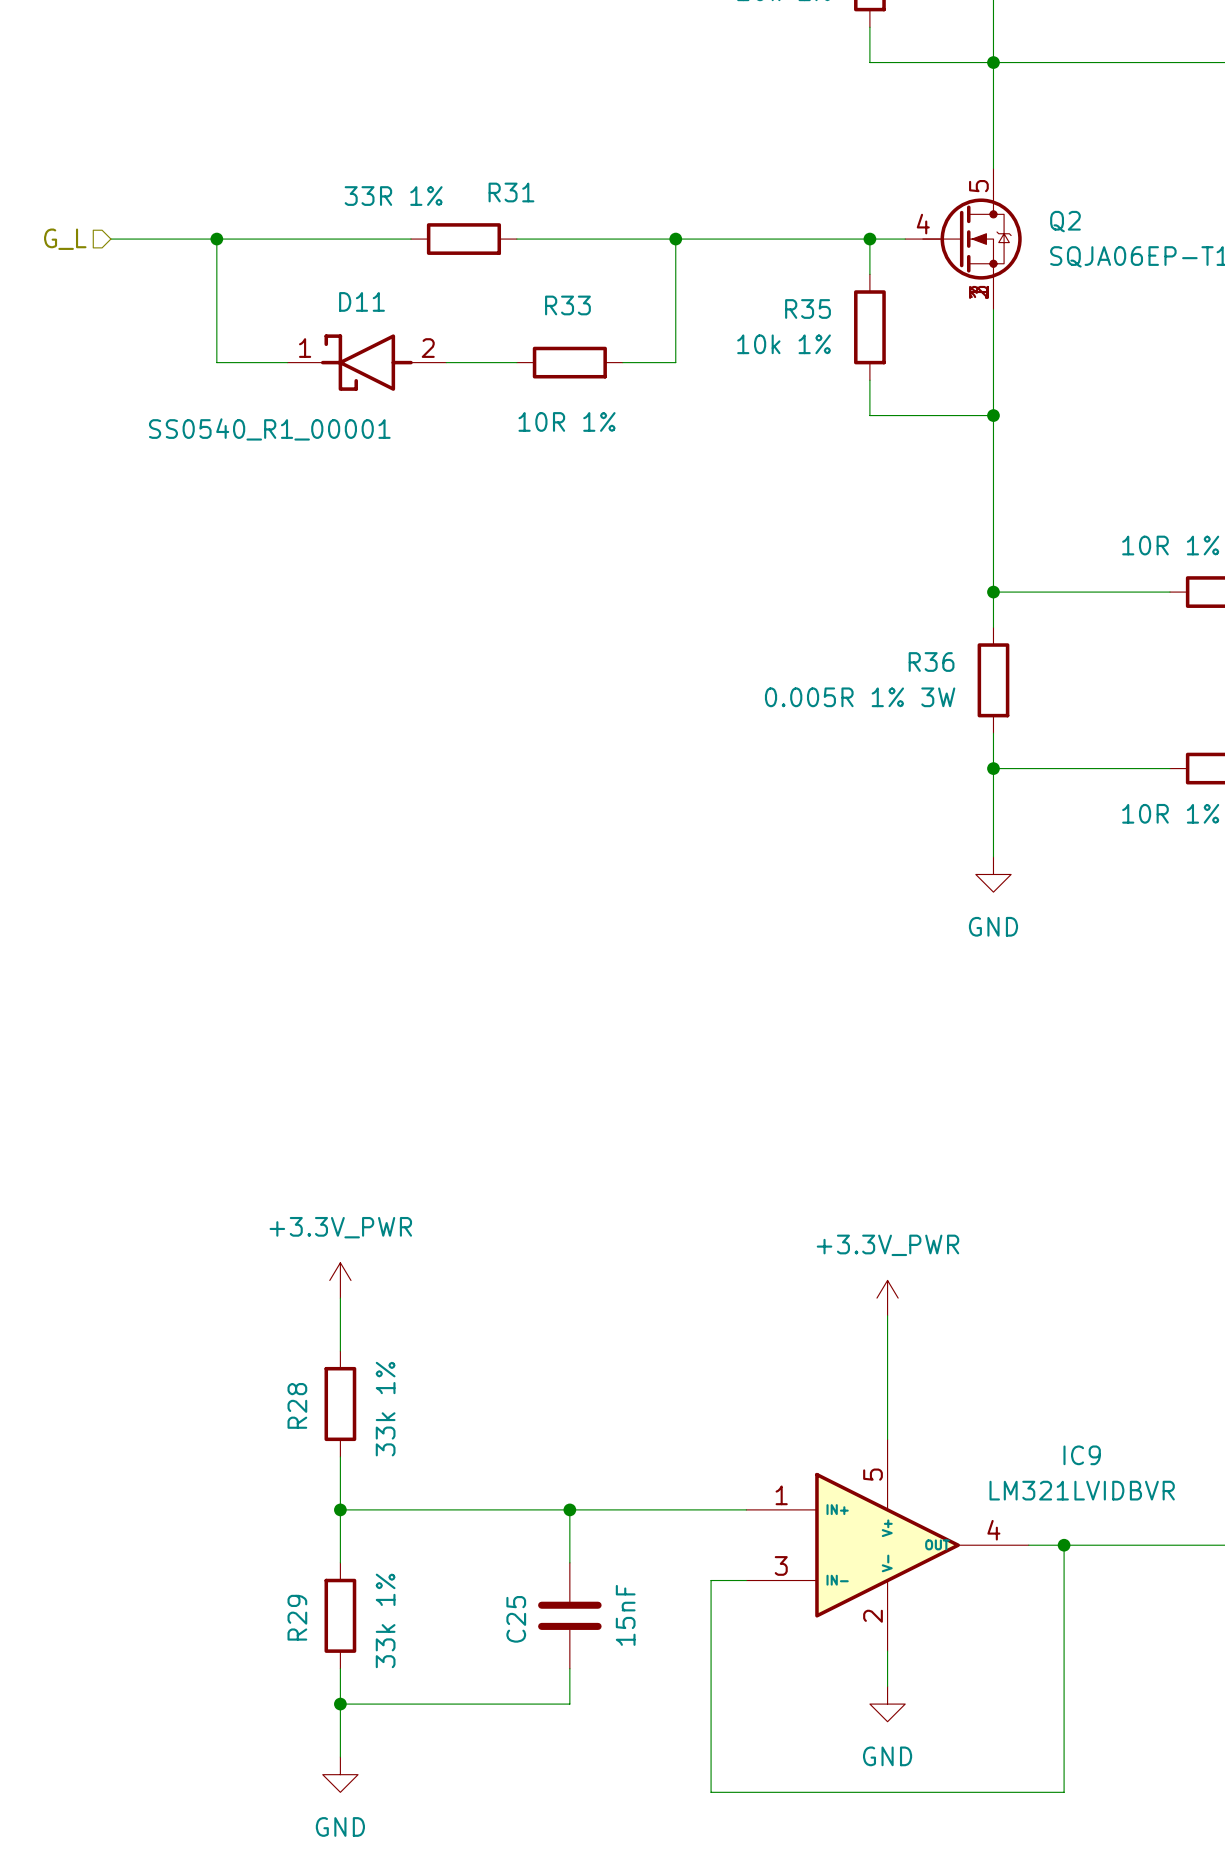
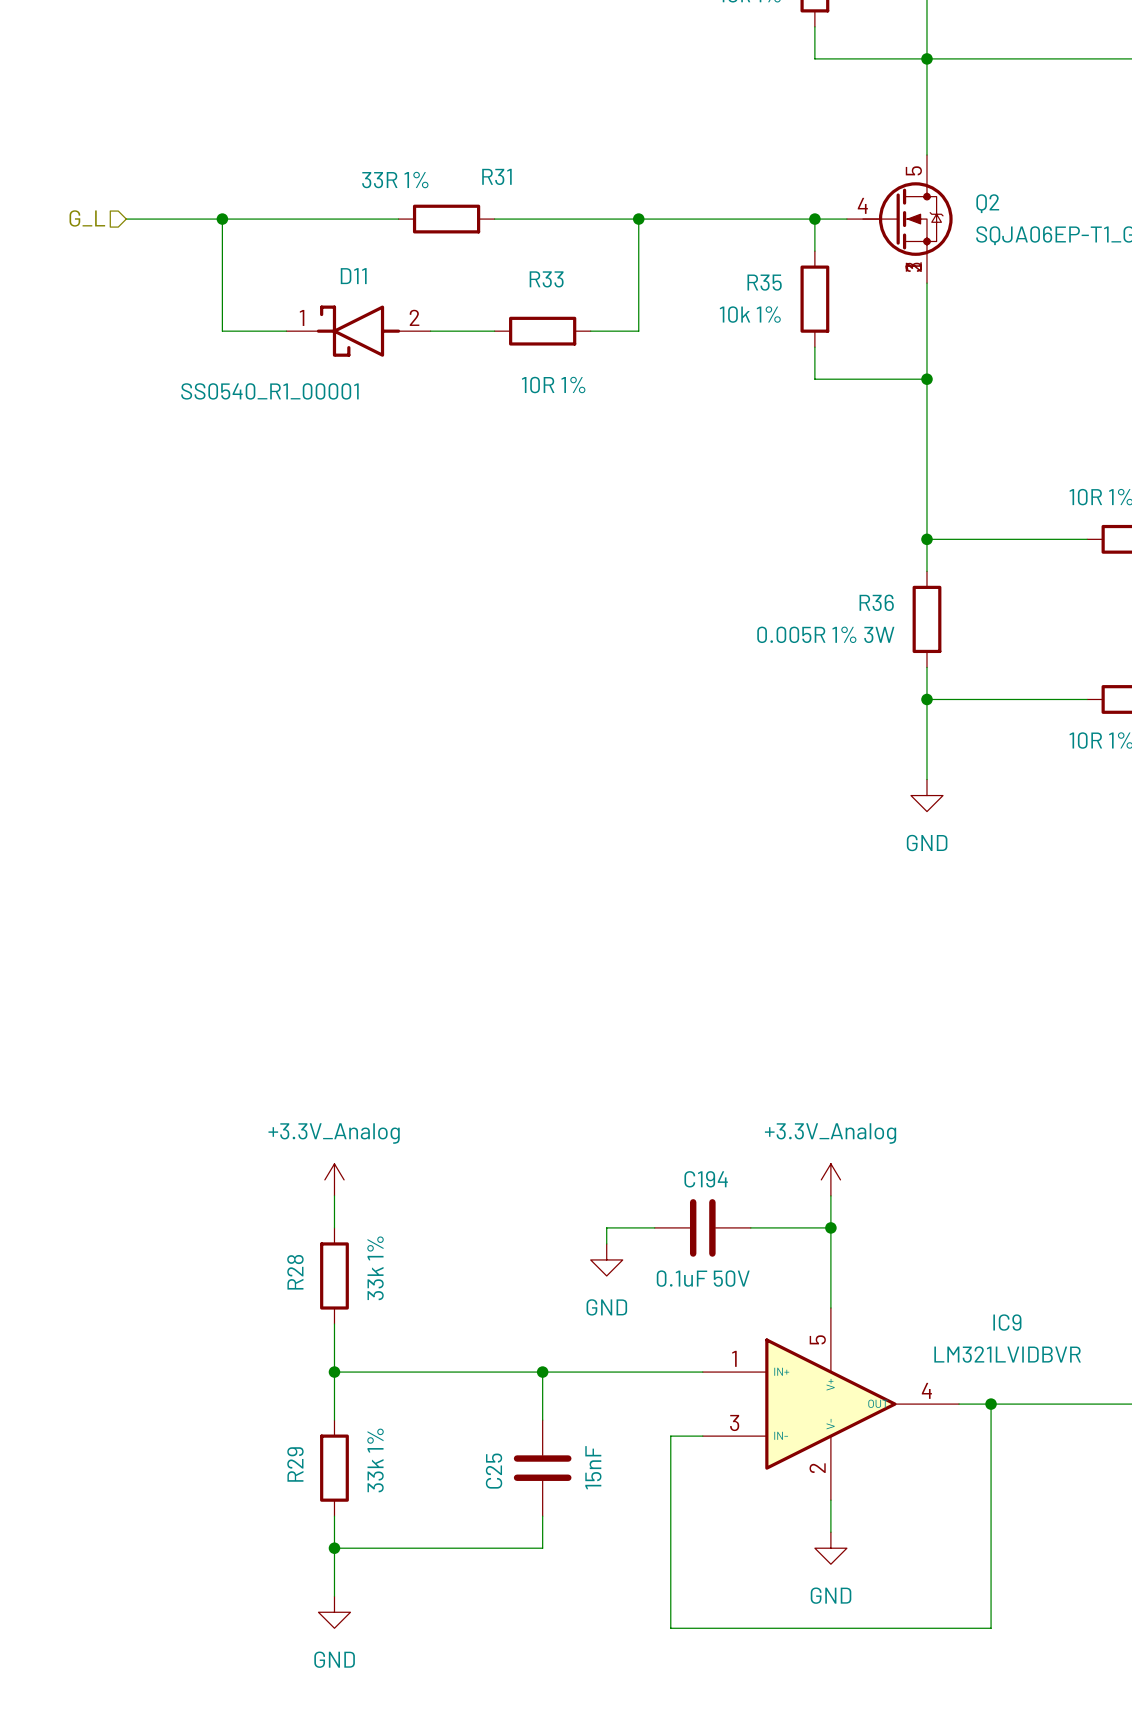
power symbol: +3.3V_PWR (340, 1280) -> none
power symbol: none -> +3.3V_Analog (334, 1179)
power symbol: +3.3V_PWR (887, 1298) -> +3.3V_Analog (830, 1179)
wire: none -> (654, 1227) (606, 1227) (606, 1243)
C194: none -> 0.1uF 50V (702, 1227)
wire: none -> (750, 1227) (830, 1227)
junction: none -> (830, 1227)
power symbol: none -> GND (606, 1259)

